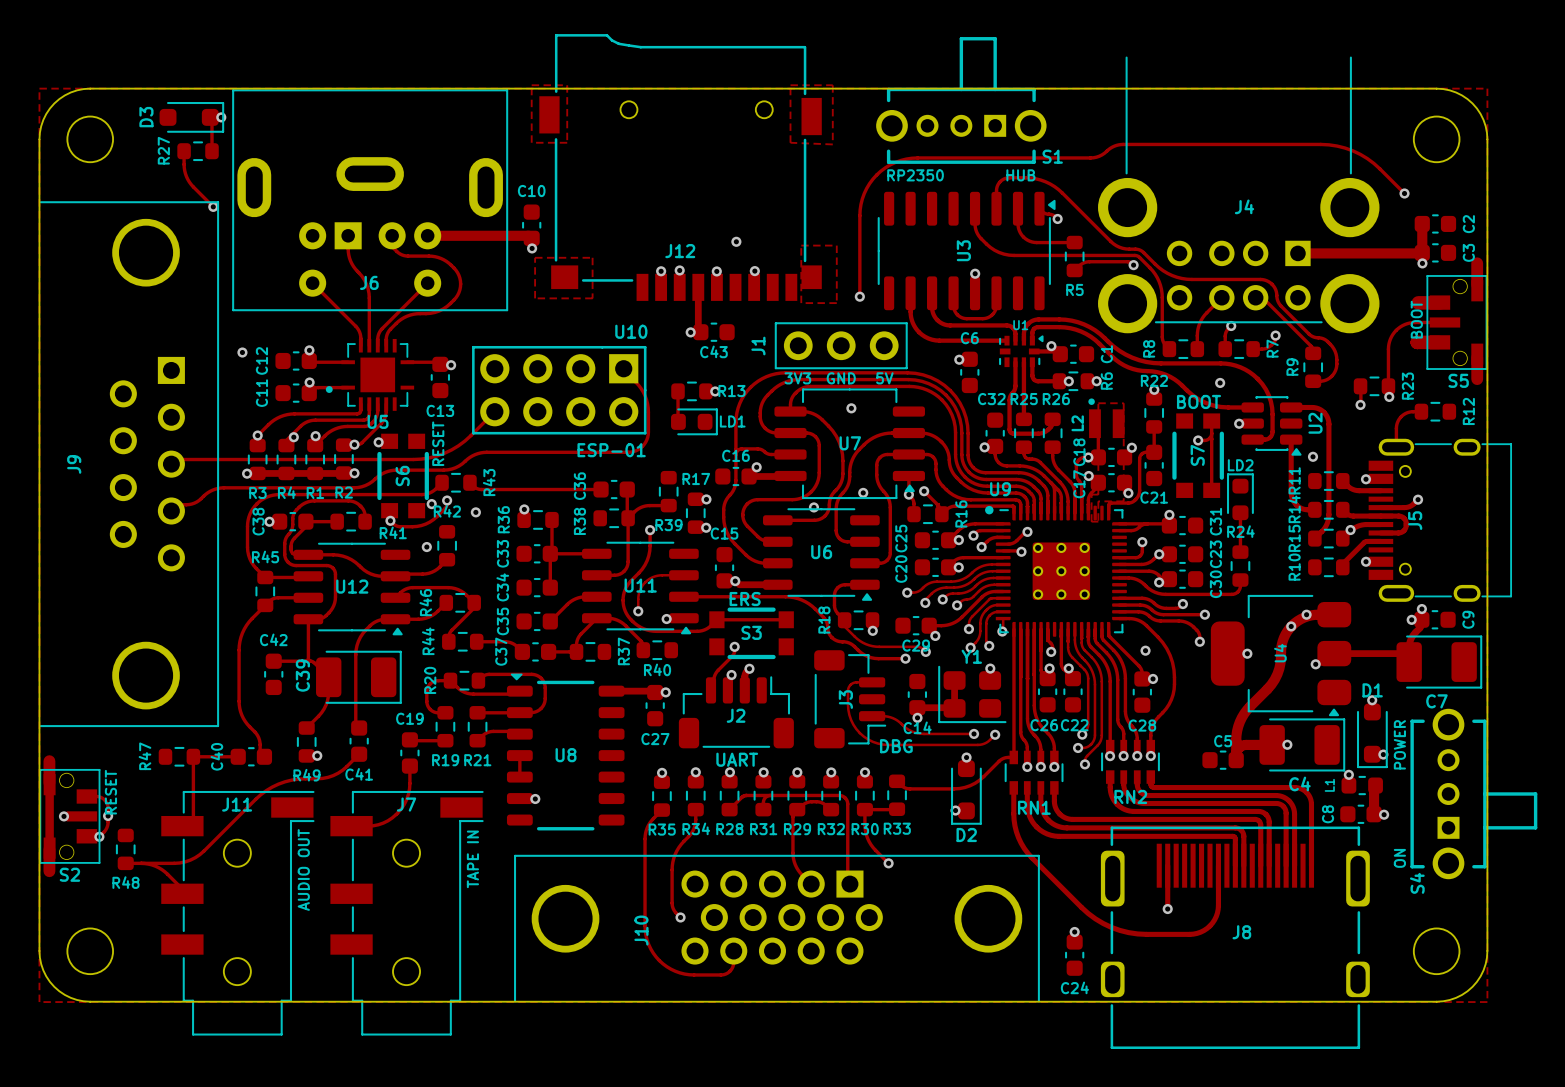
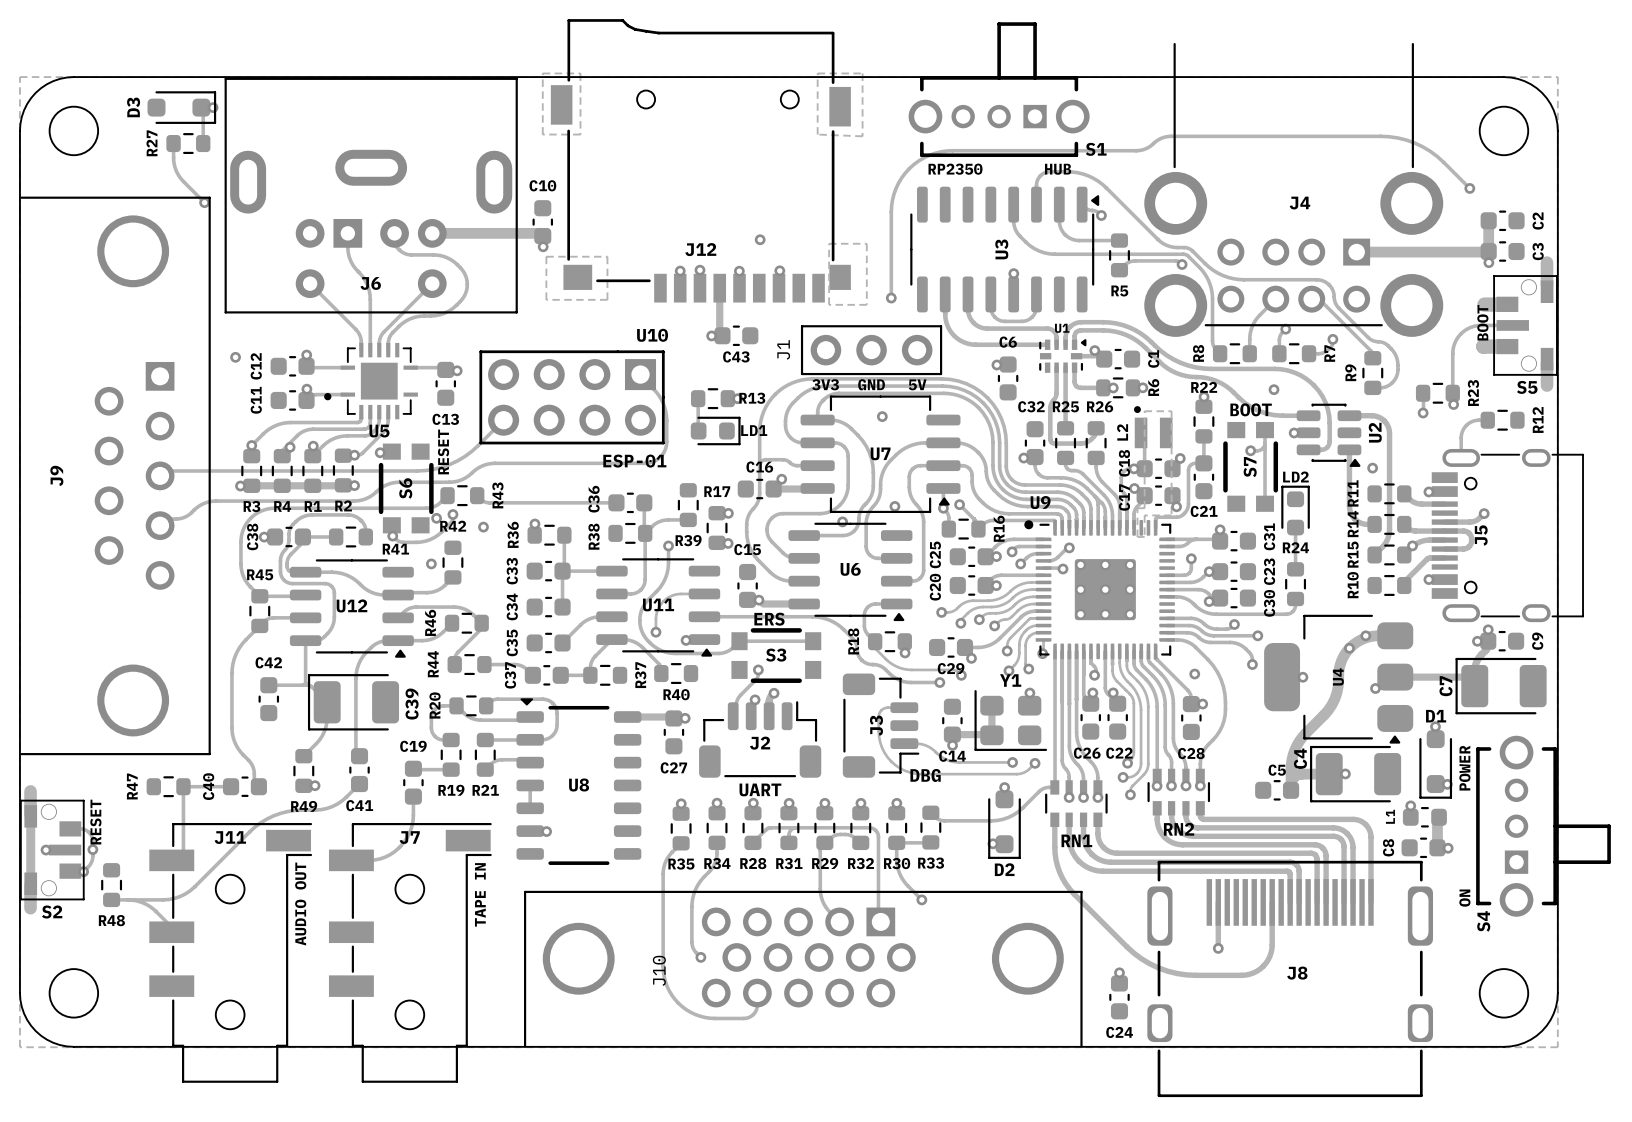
C7 rotation: 0° (1439, 662) -> 180° (1501, 686)
C39 rotation: 0° (358, 677) -> 180° (353, 702)
C7 name position: C7 (1436, 701) -> C7 (1446, 686)
C4 rotation: 0° (1302, 744) -> 180° (1355, 774)
C4 name position: C4 (1299, 783) -> C4 (1300, 758)

